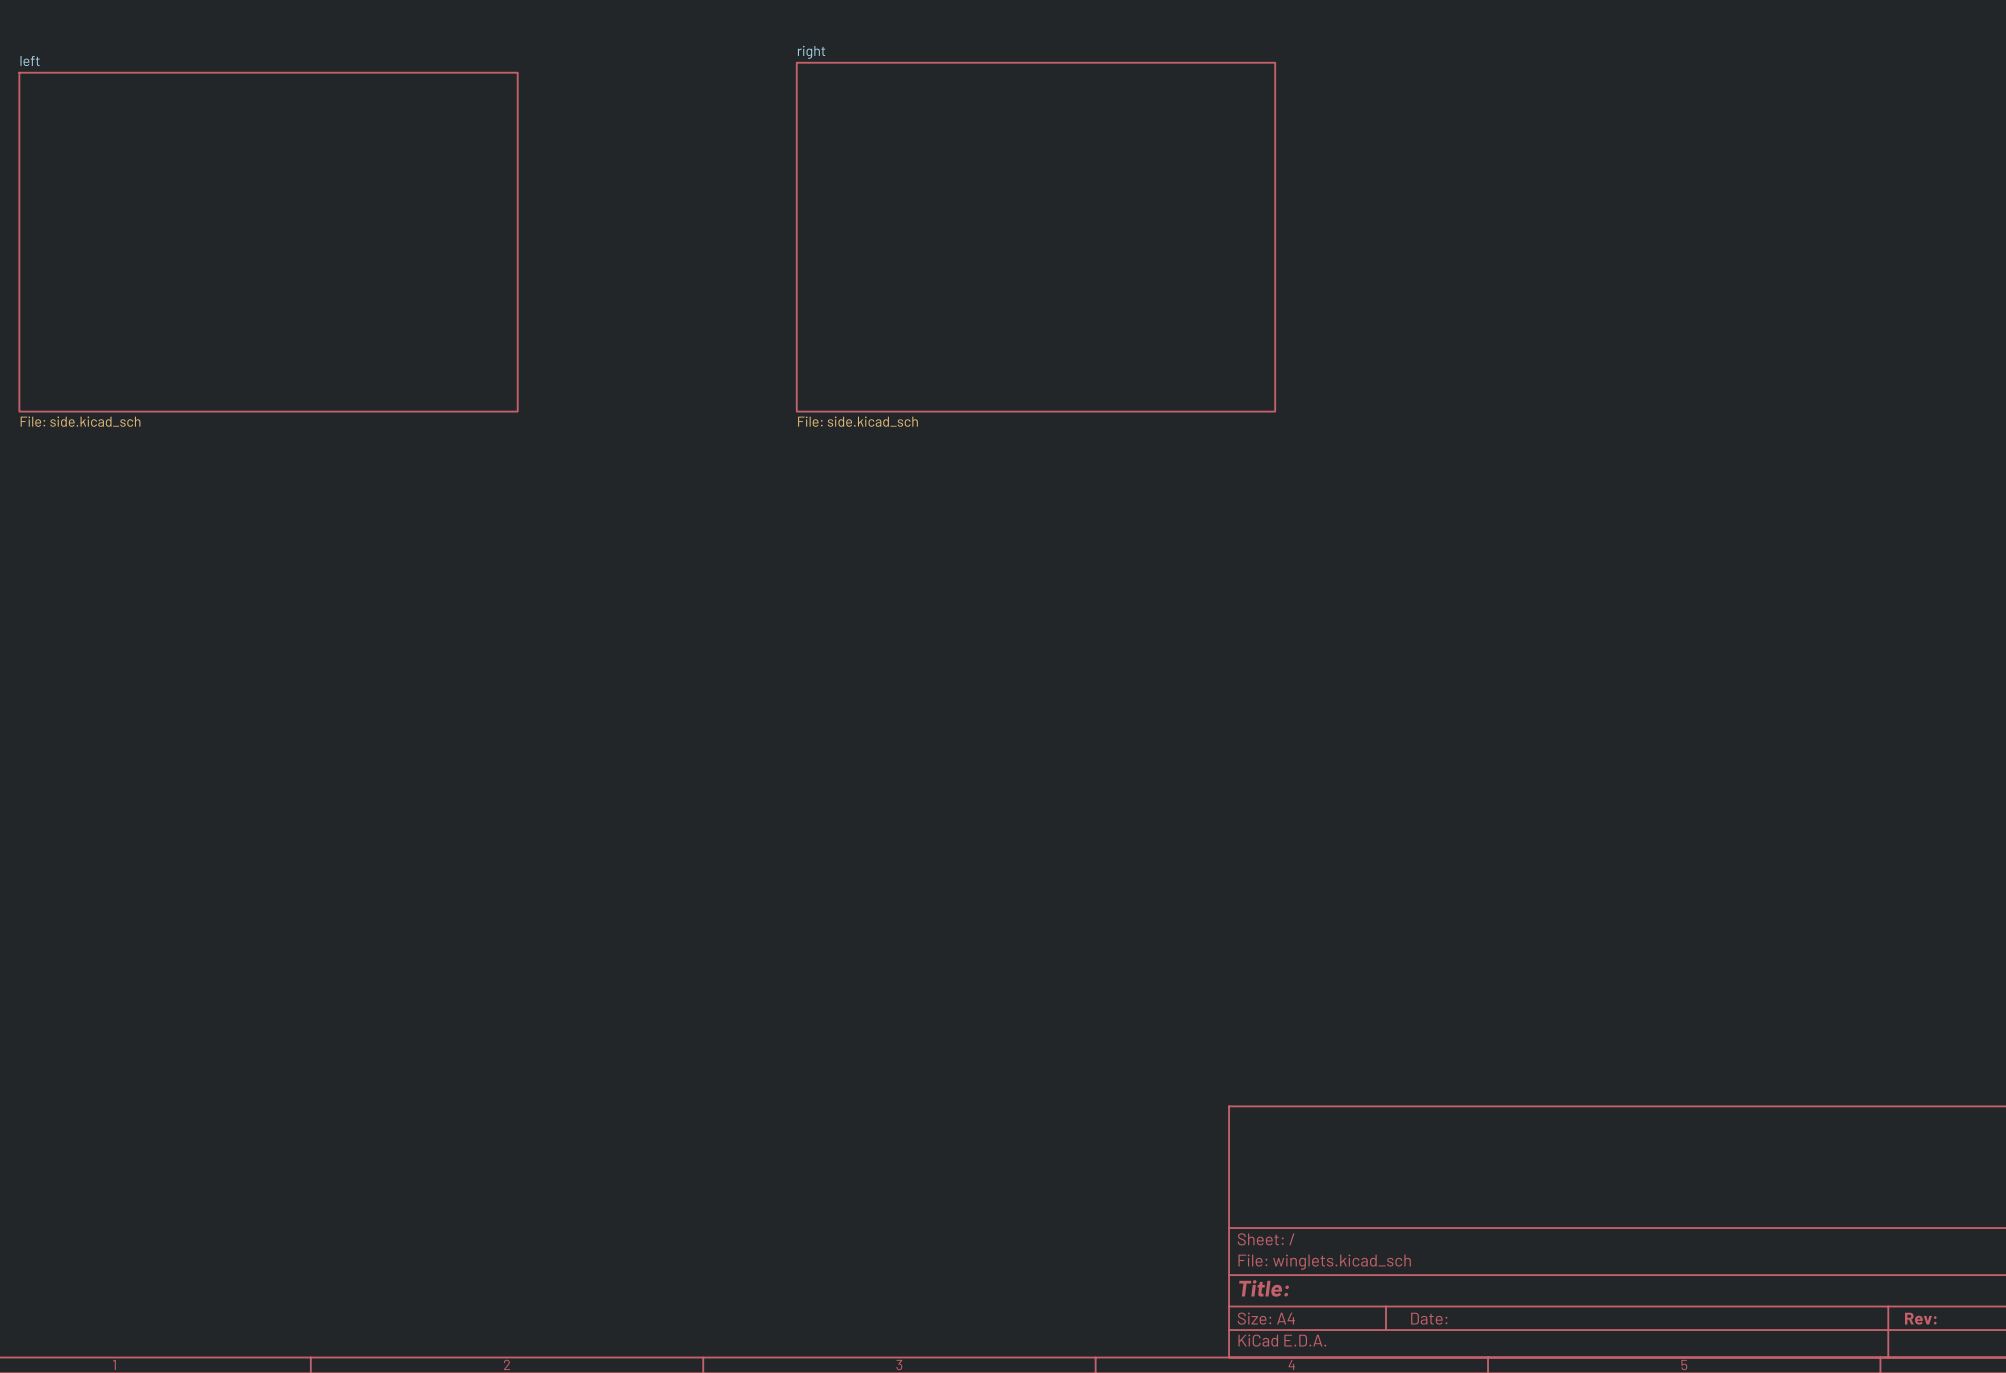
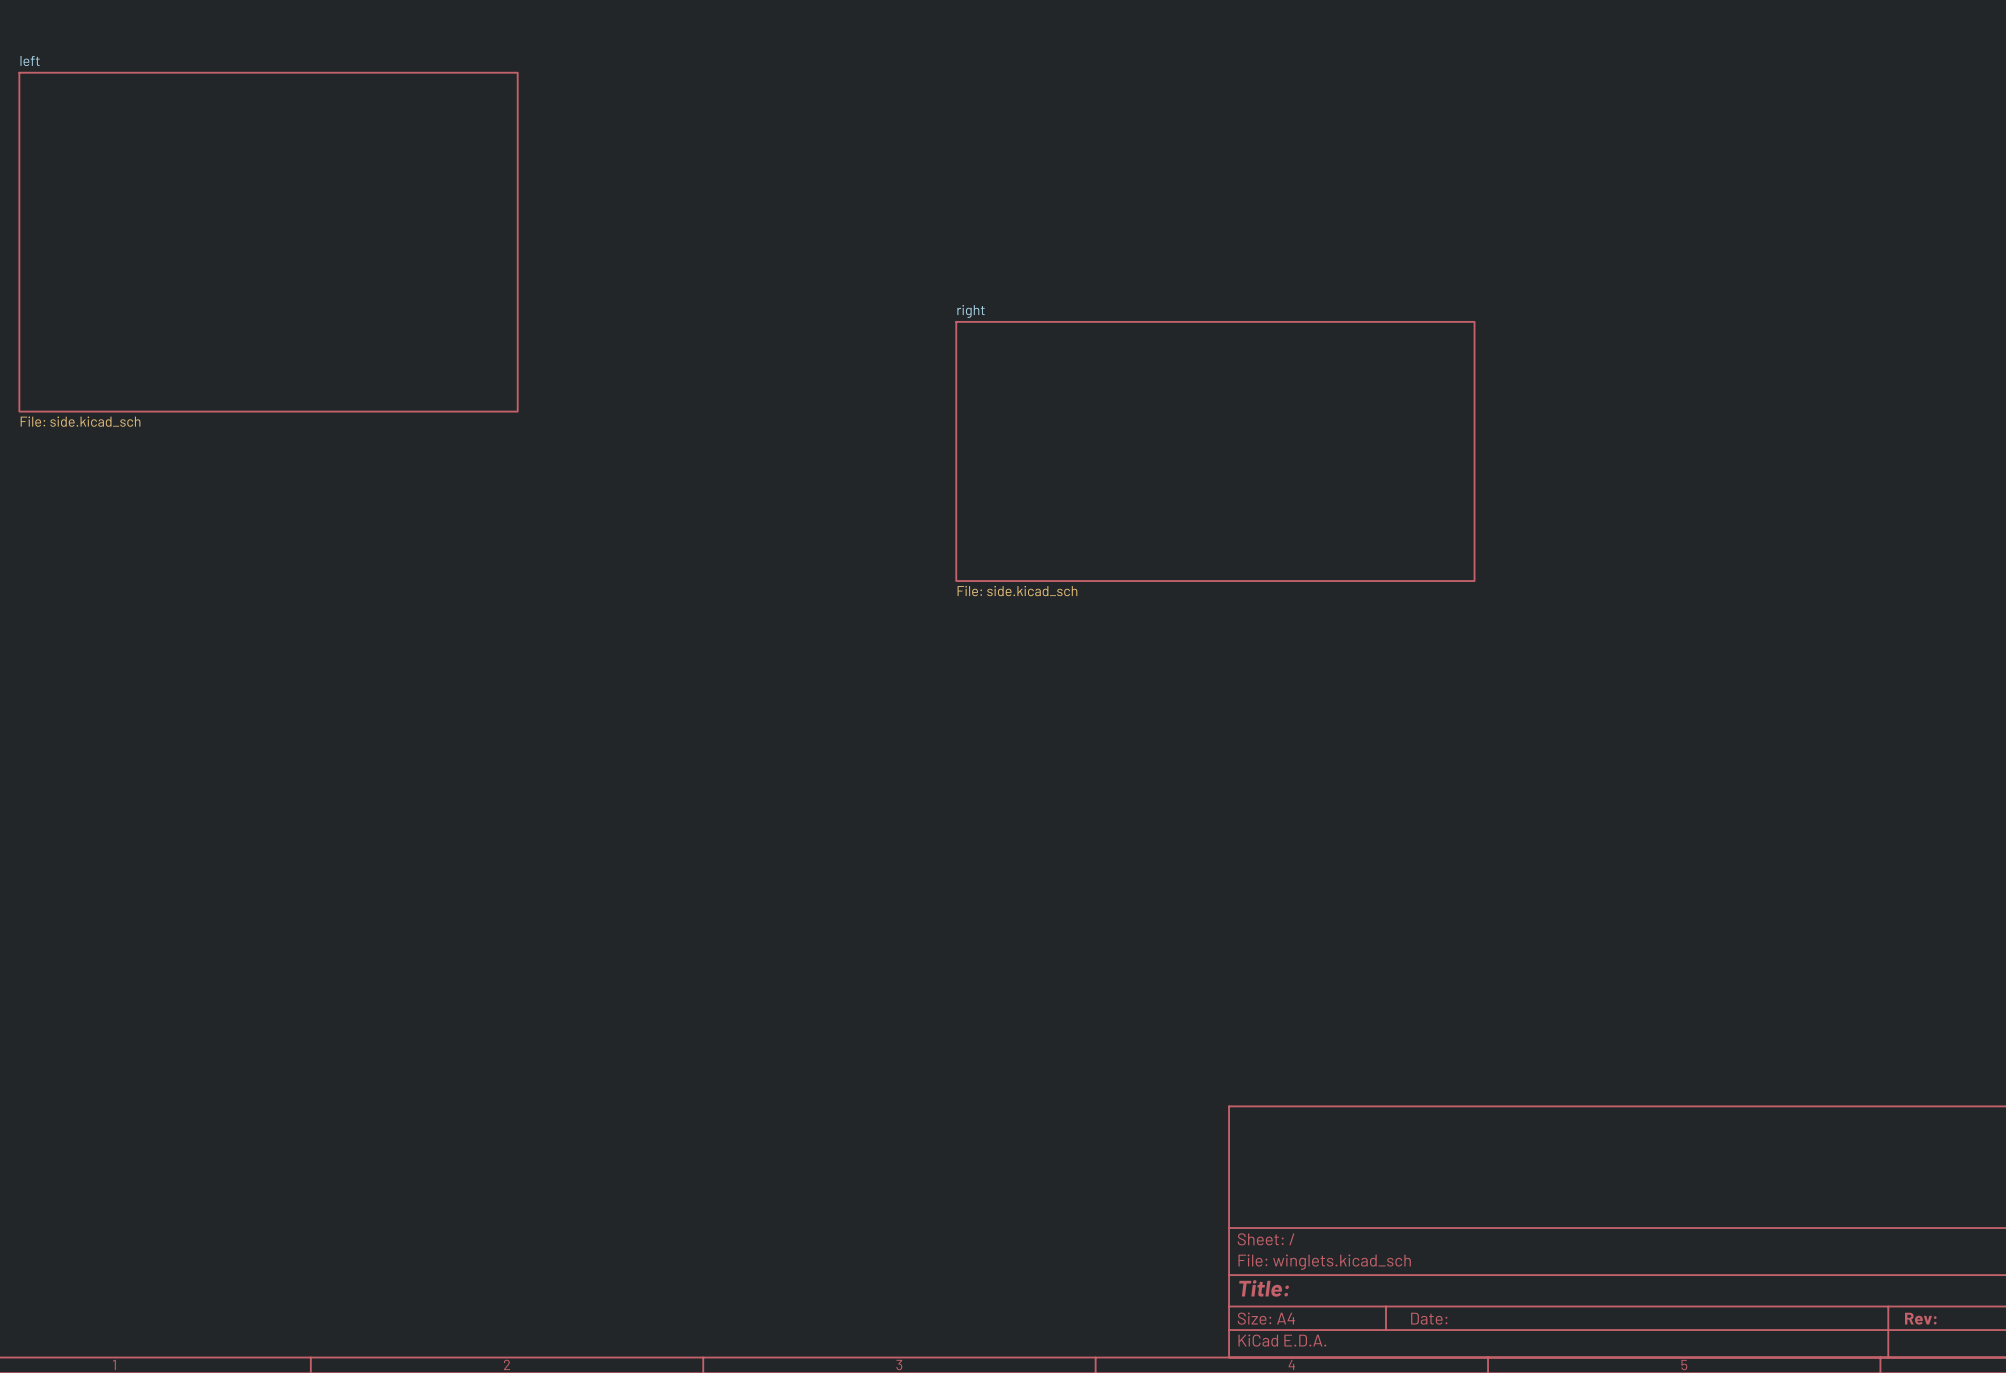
sheet right: File: side.kicad_sch (1035, 237) -> none
sheet right: none -> File: side.kicad_sch (1215, 451)

